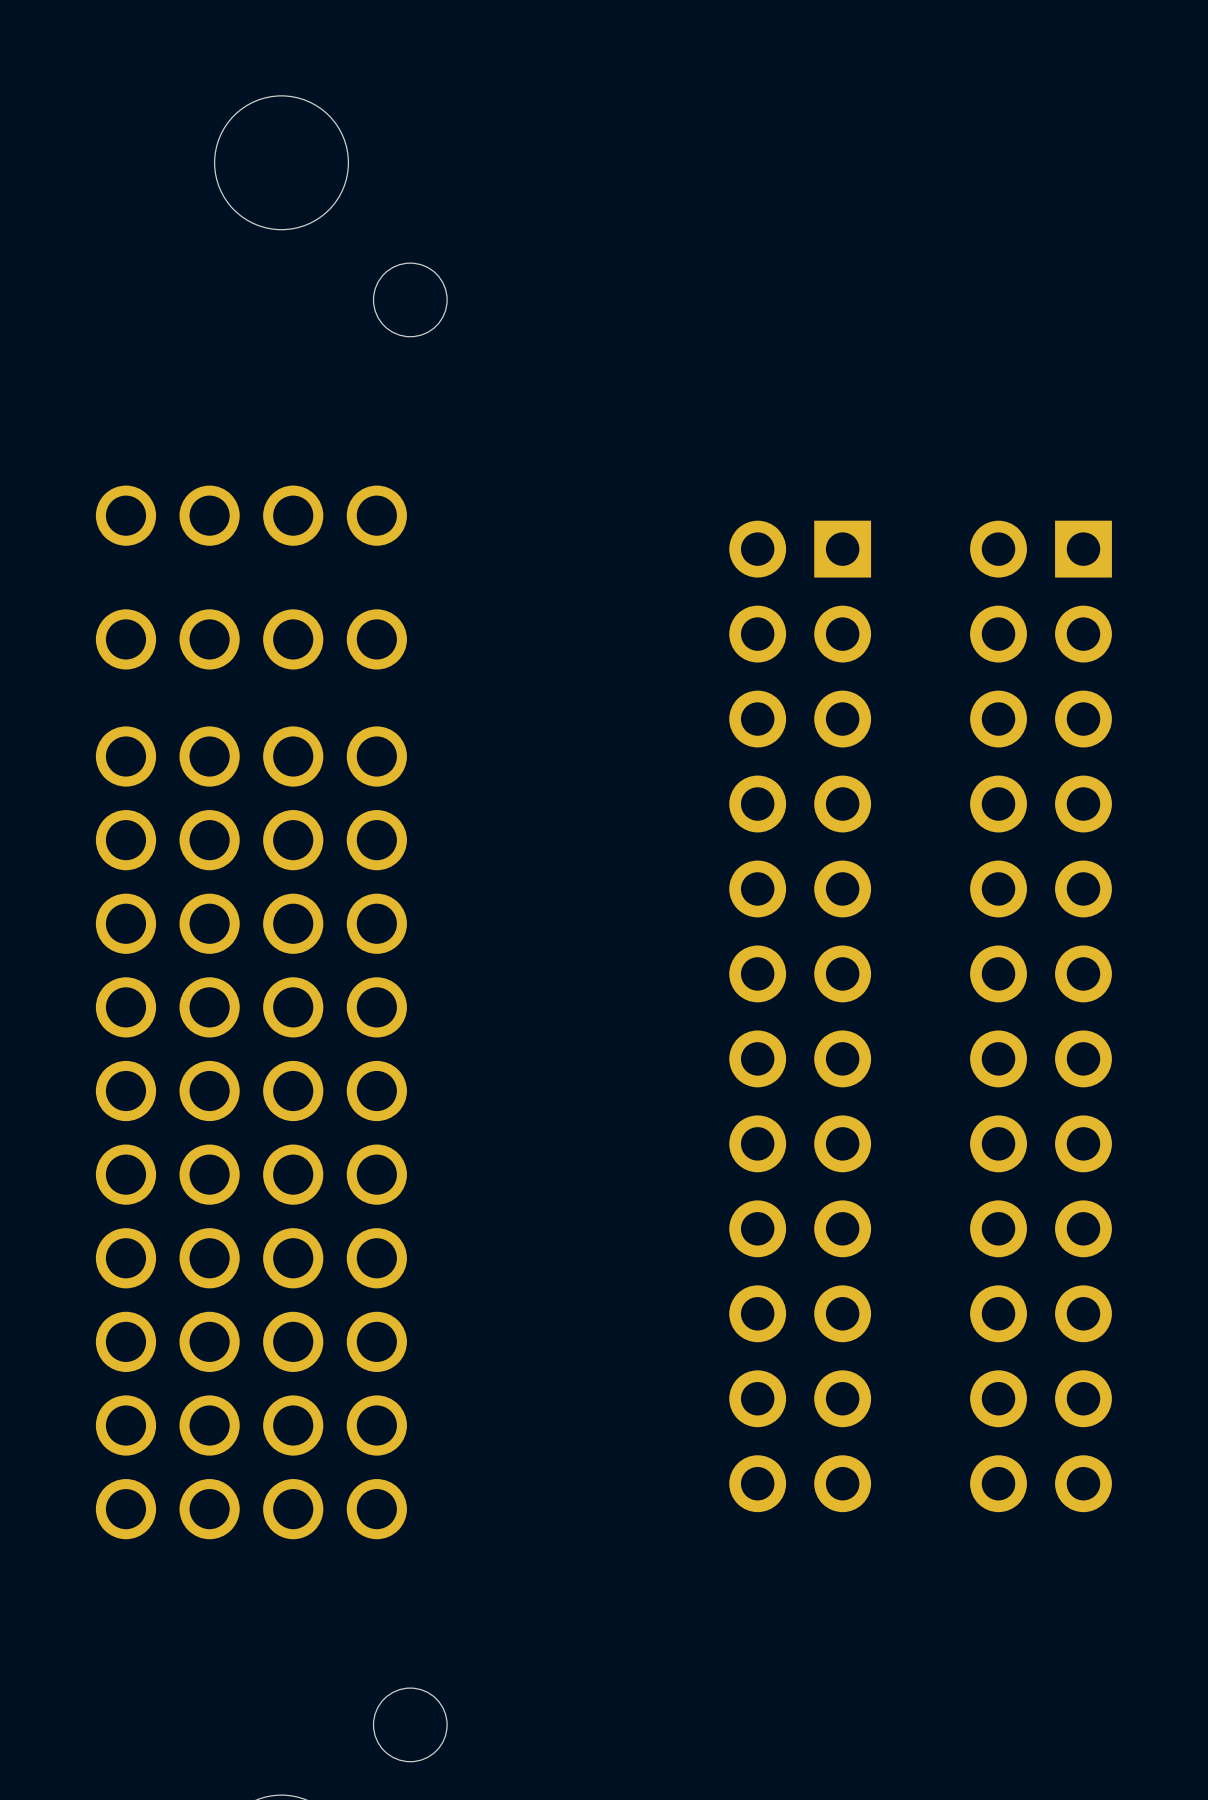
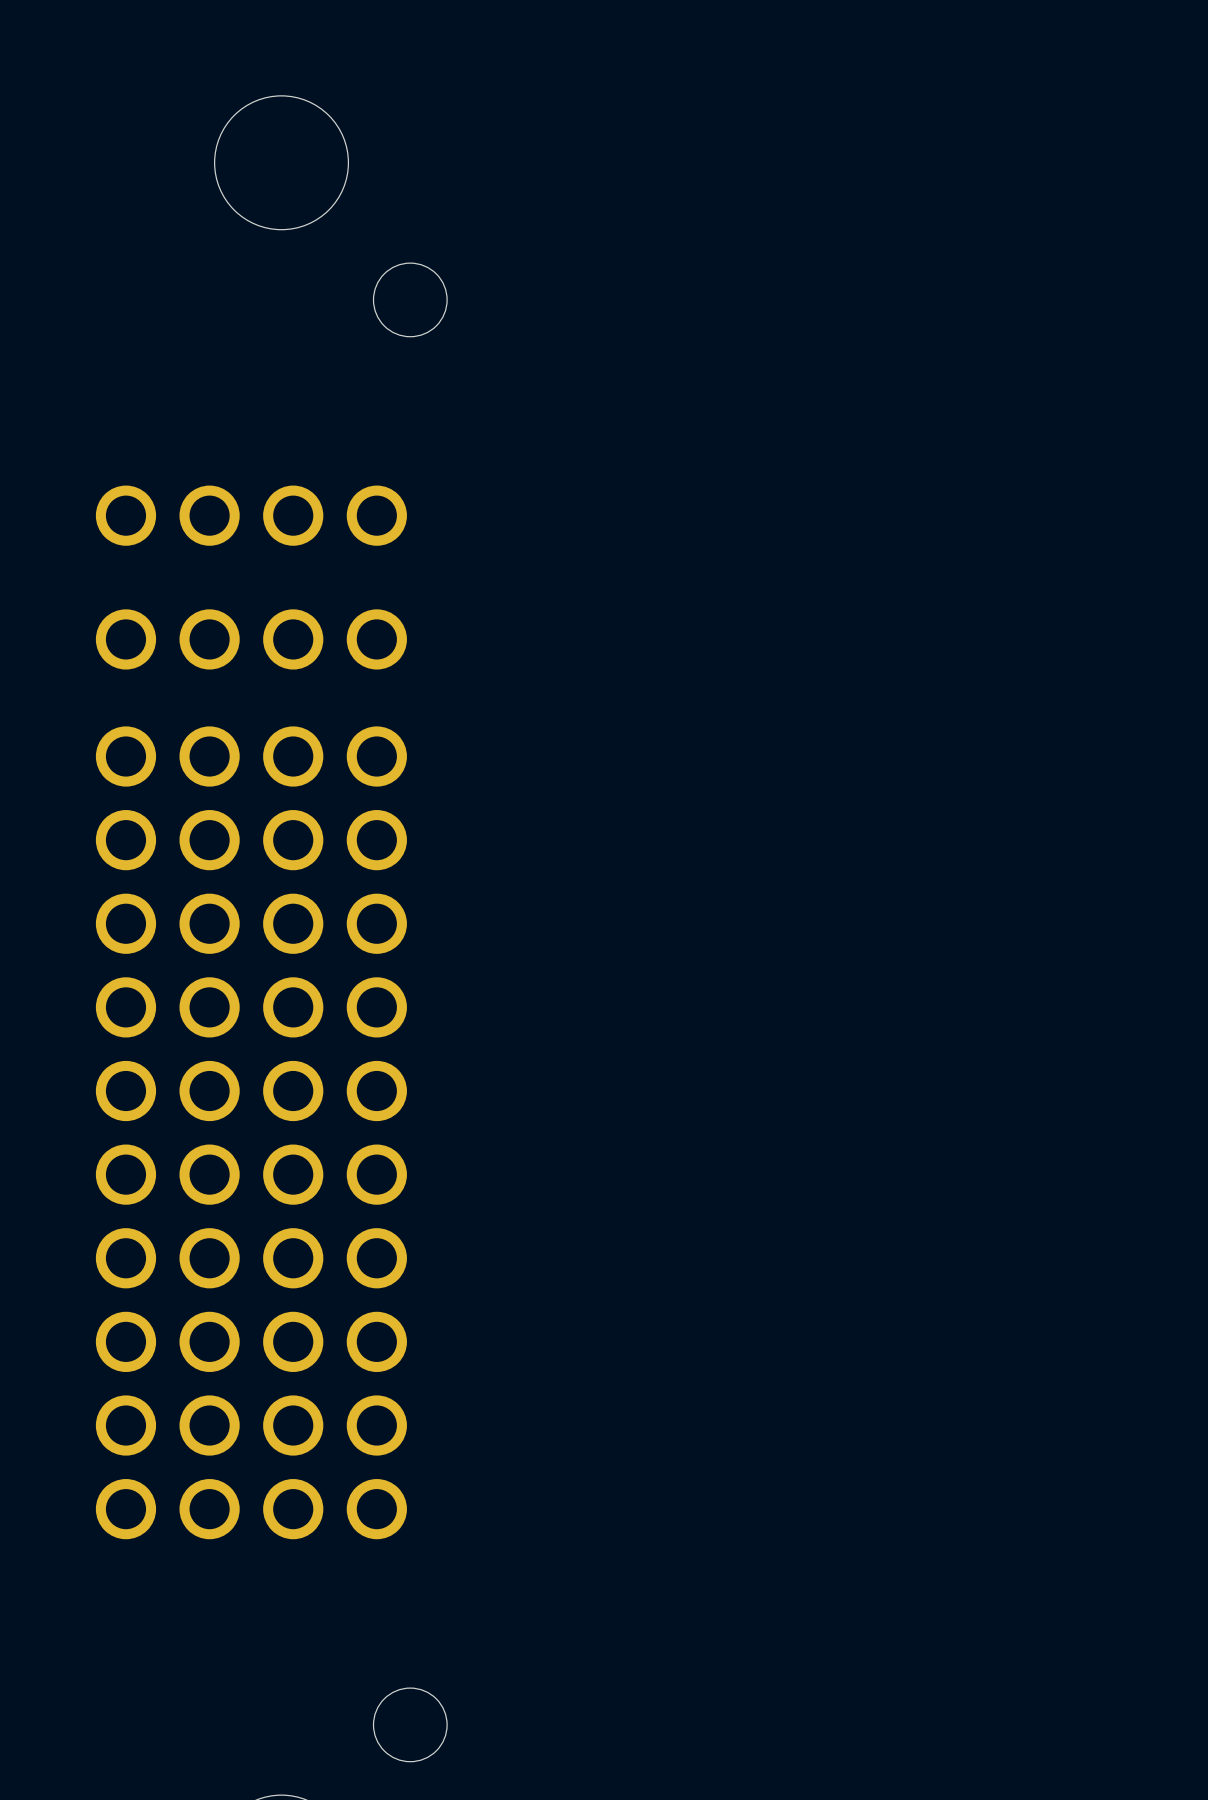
part: (800, 1016) -> none
part: (1041, 1016) -> none

